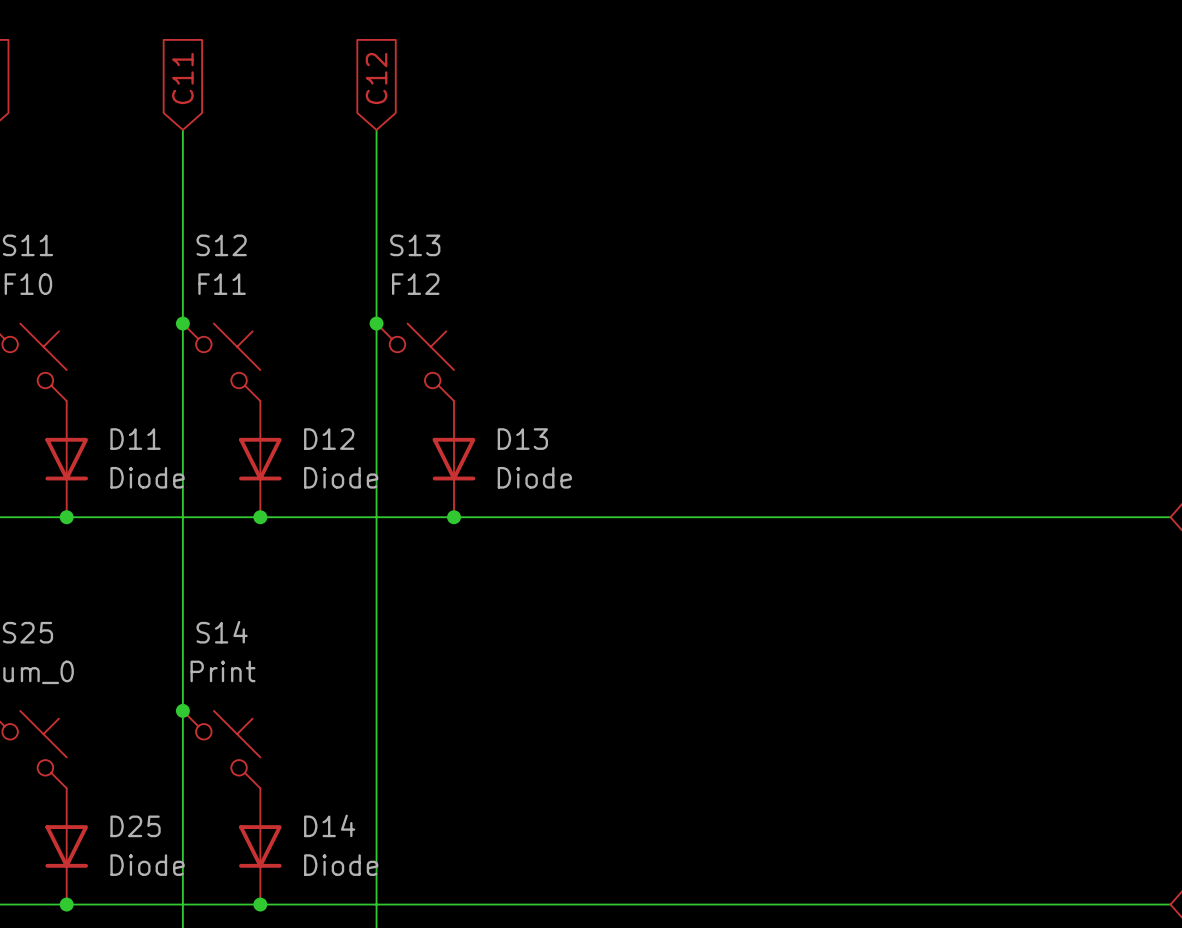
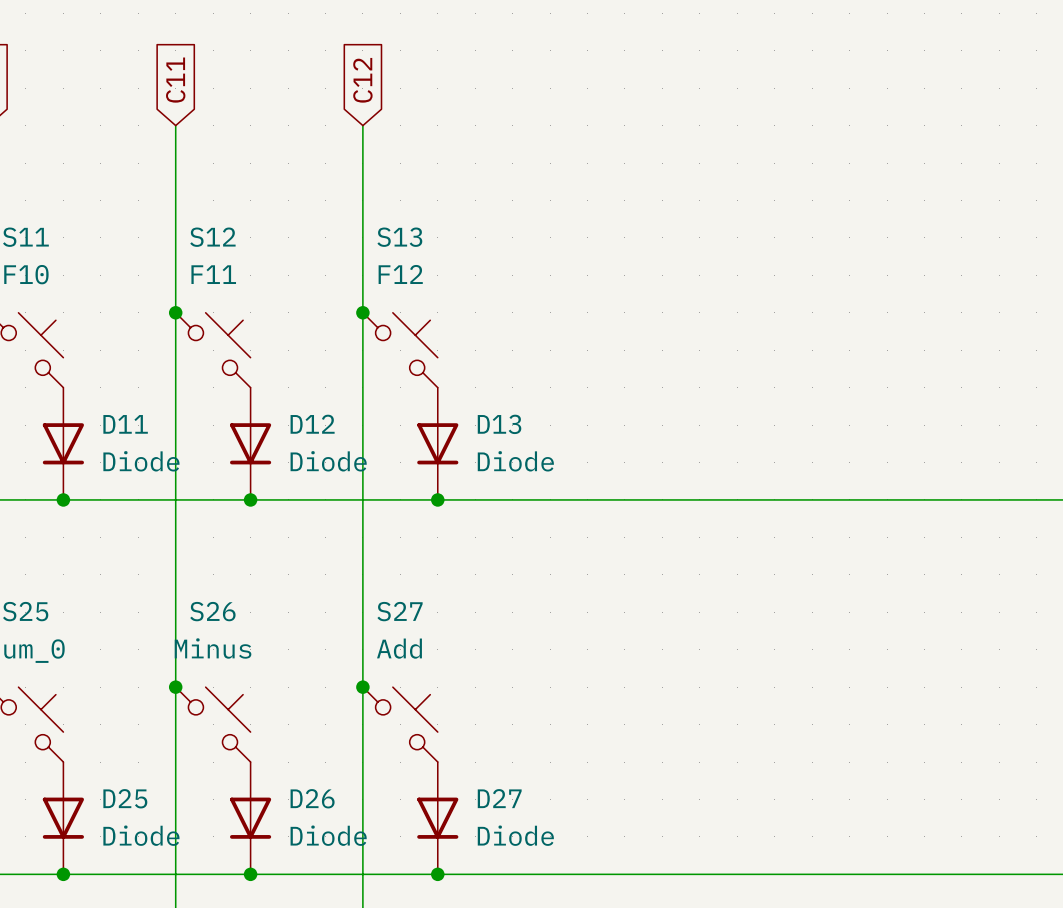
S14 name: S14 (222, 632) -> S26 (212, 611)
S14 value: Print (223, 671) -> Minus (213, 648)
junction: none -> (362, 687)
S27: none -> Add (400, 724)
D14 name: D14 (329, 825) -> D26 (312, 798)
D27: none -> Diode (437, 818)
junction: none -> (437, 874)

